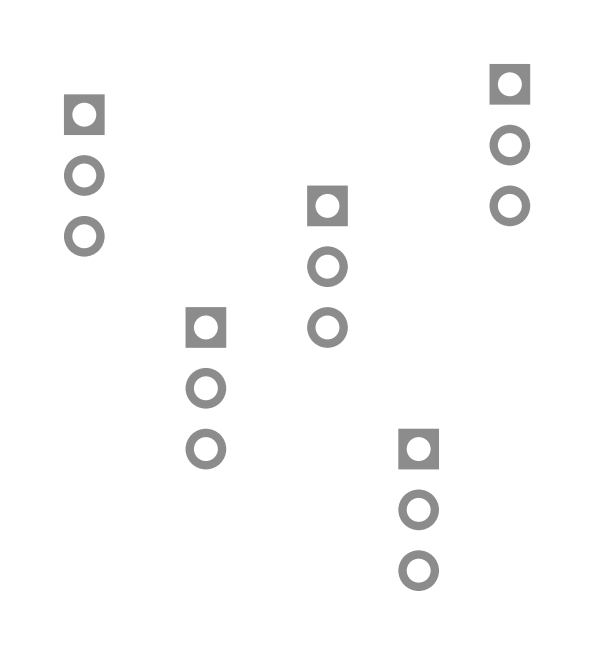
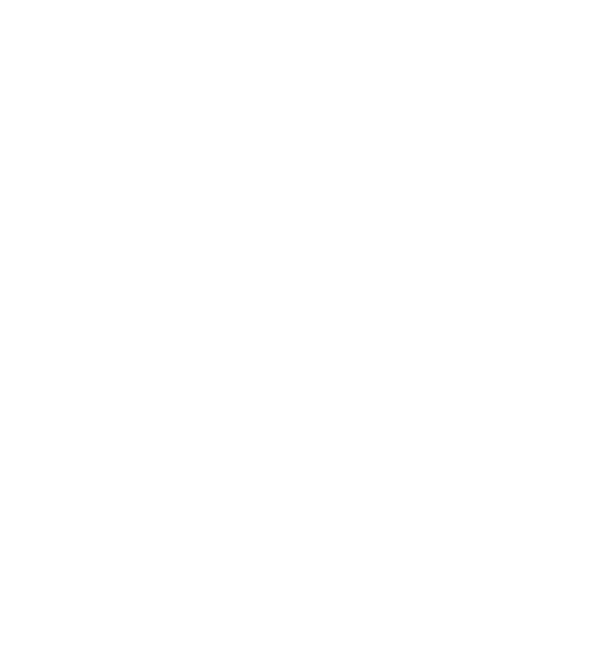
part: (509, 145) -> none
part: (84, 175) -> none
part: (327, 266) -> none
part: (205, 388) -> none
part: (418, 509) -> none

